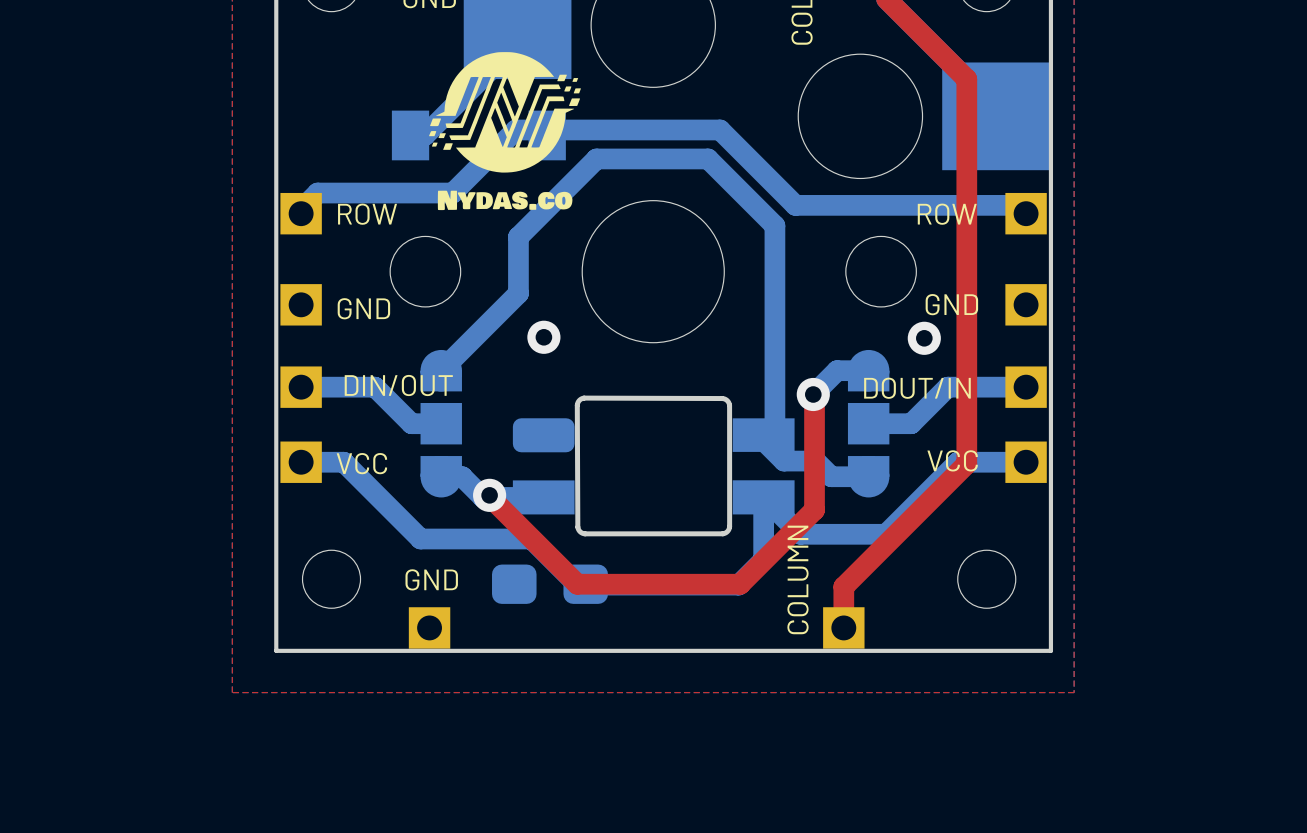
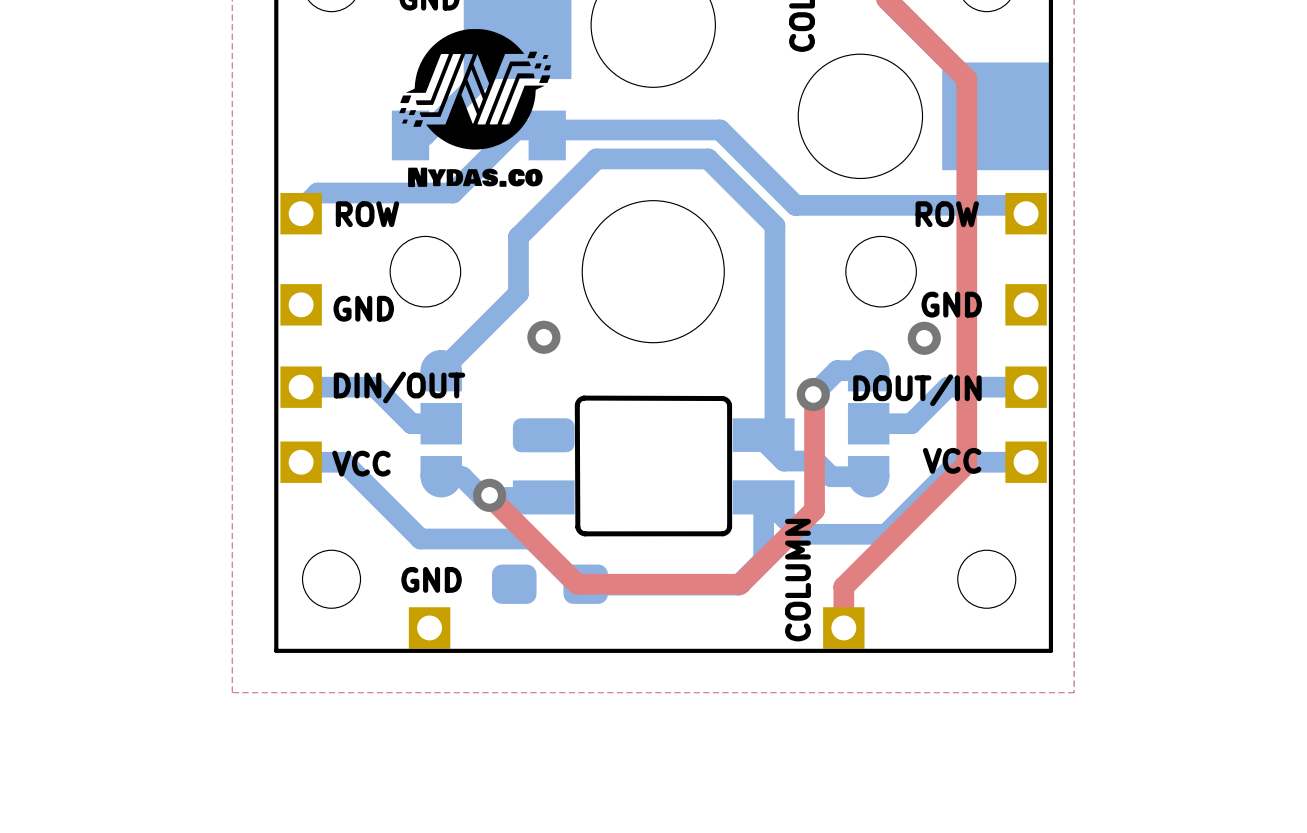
drawing position: (504, 131) -> (475, 108)

